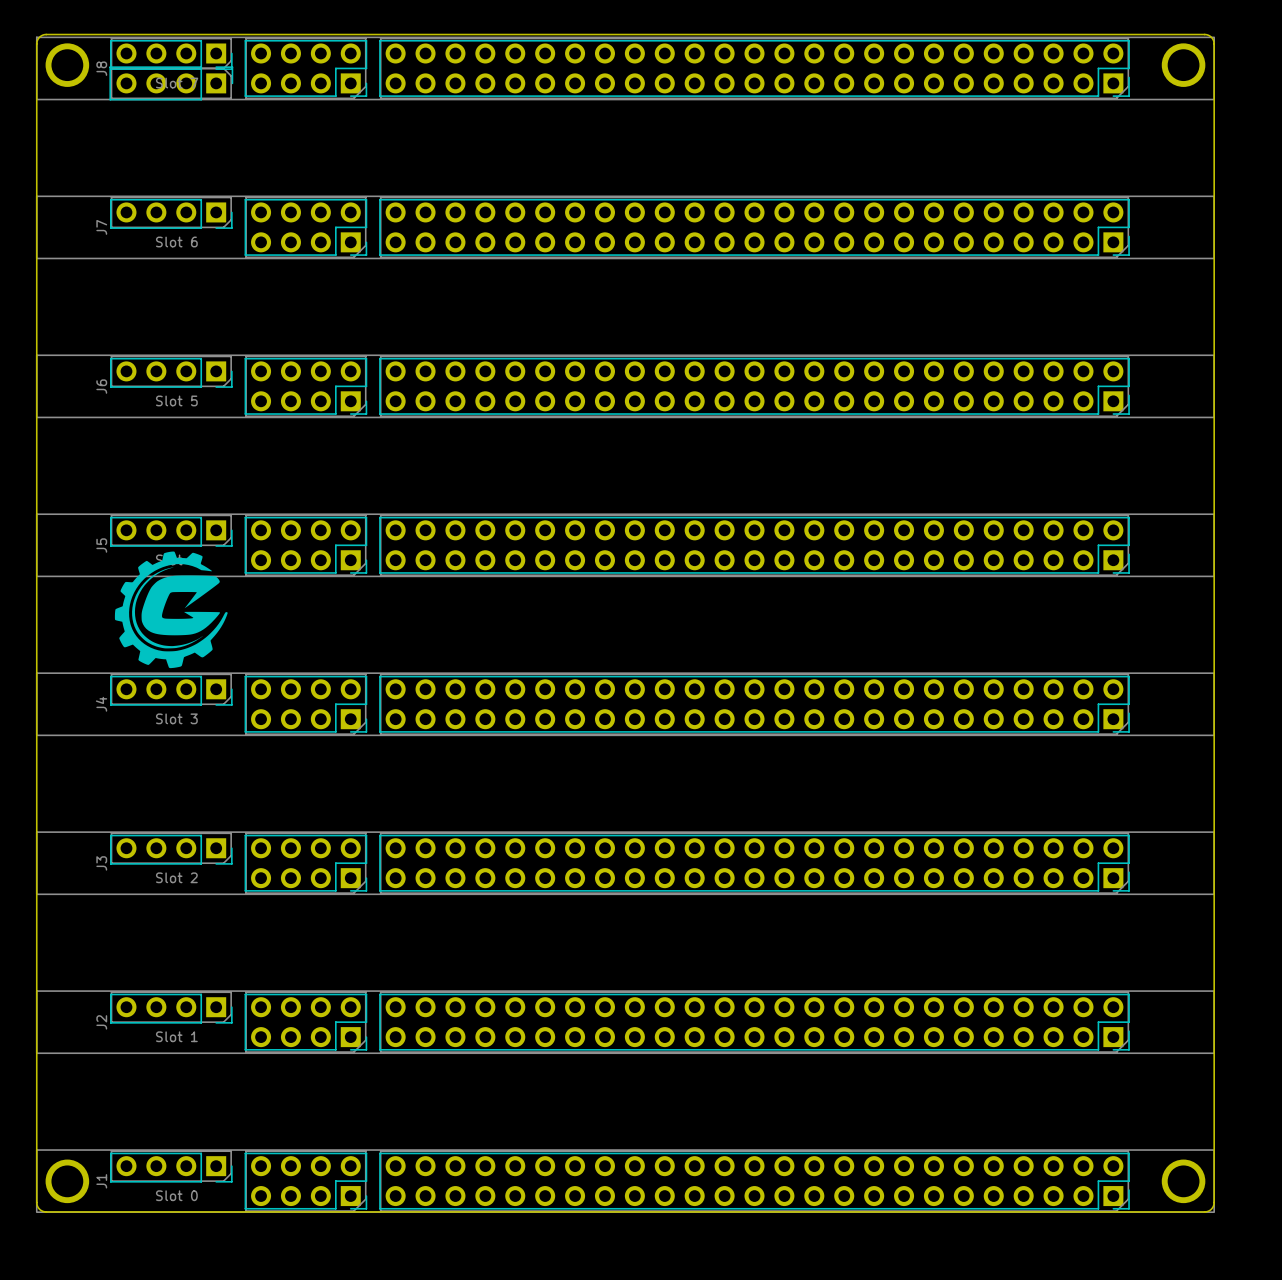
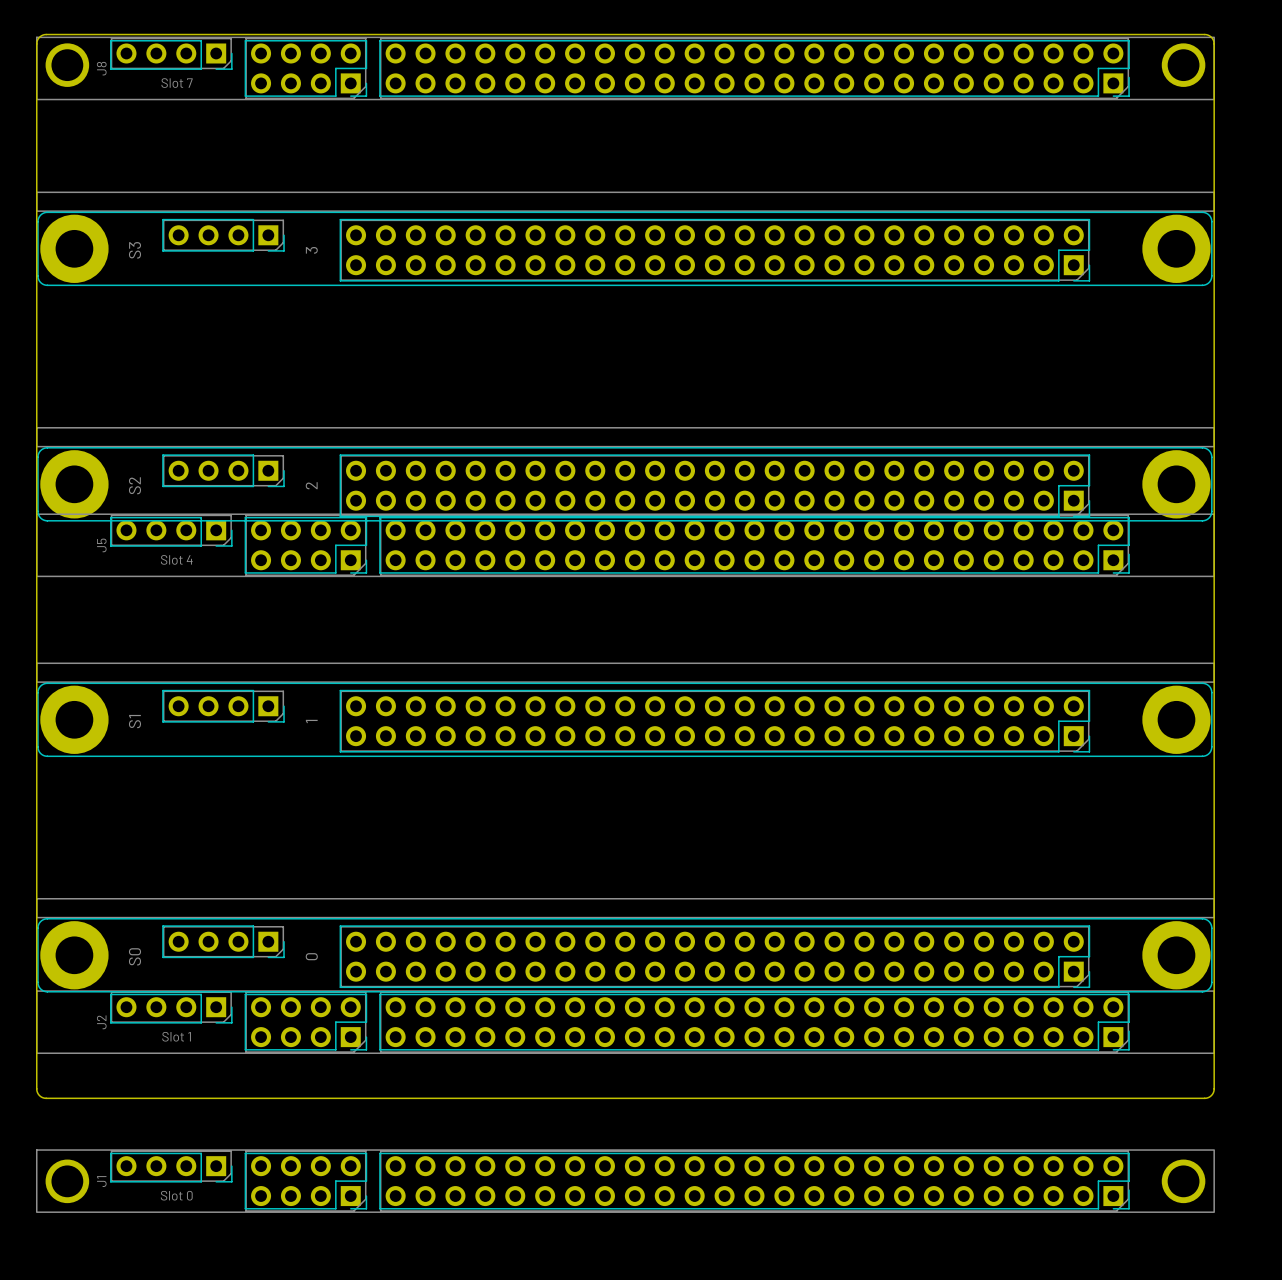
part: (171, 83) -> none
J7: Slot 6 (625, 227) -> none
S3: none -> 3 (625, 238)
J6: Slot 5 (625, 386) -> none
S2: none -> 2 (625, 474)
drawing: [114, 551, 228, 669] -> none
J4: Slot 3 (625, 704) -> none
S1: none -> 1 (625, 709)
J3: Slot 2 (625, 863) -> none
S0: none -> 0 (625, 945)
board edge: (36, 1088) (36, 1203) (40, 1210) (46, 1211) (1205, 1211) (1211, 1209) (1214, 1203) (1214, 1088) -> (36, 1088) (39, 1095) (46, 1098) (1204, 1098) (1211, 1095) (1214, 1088)

